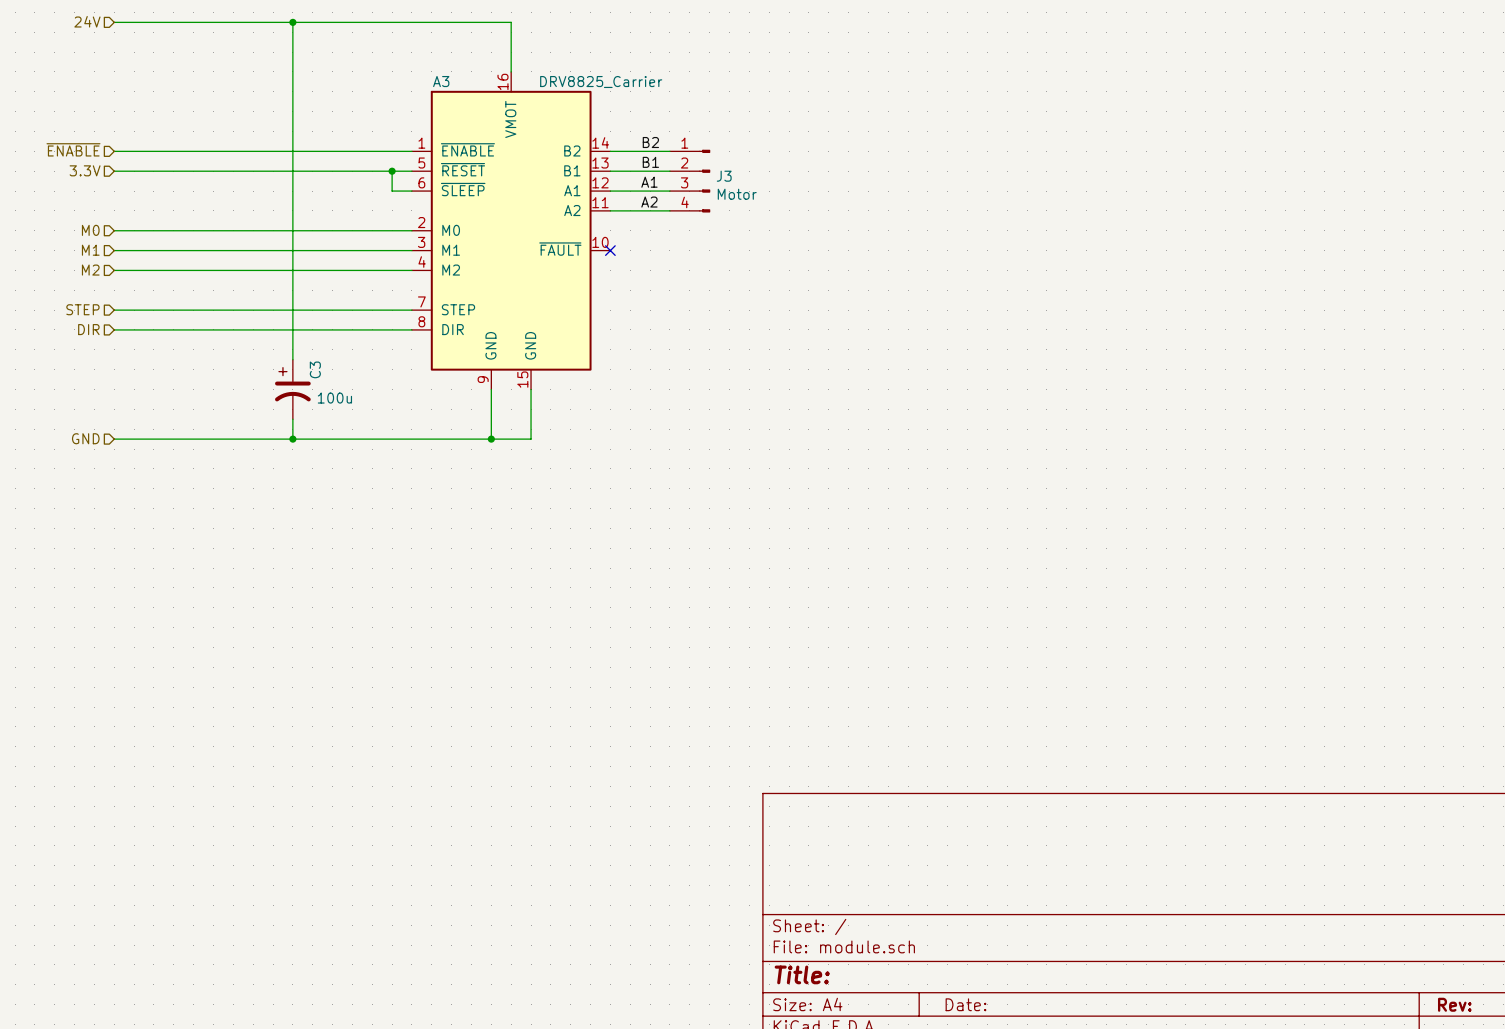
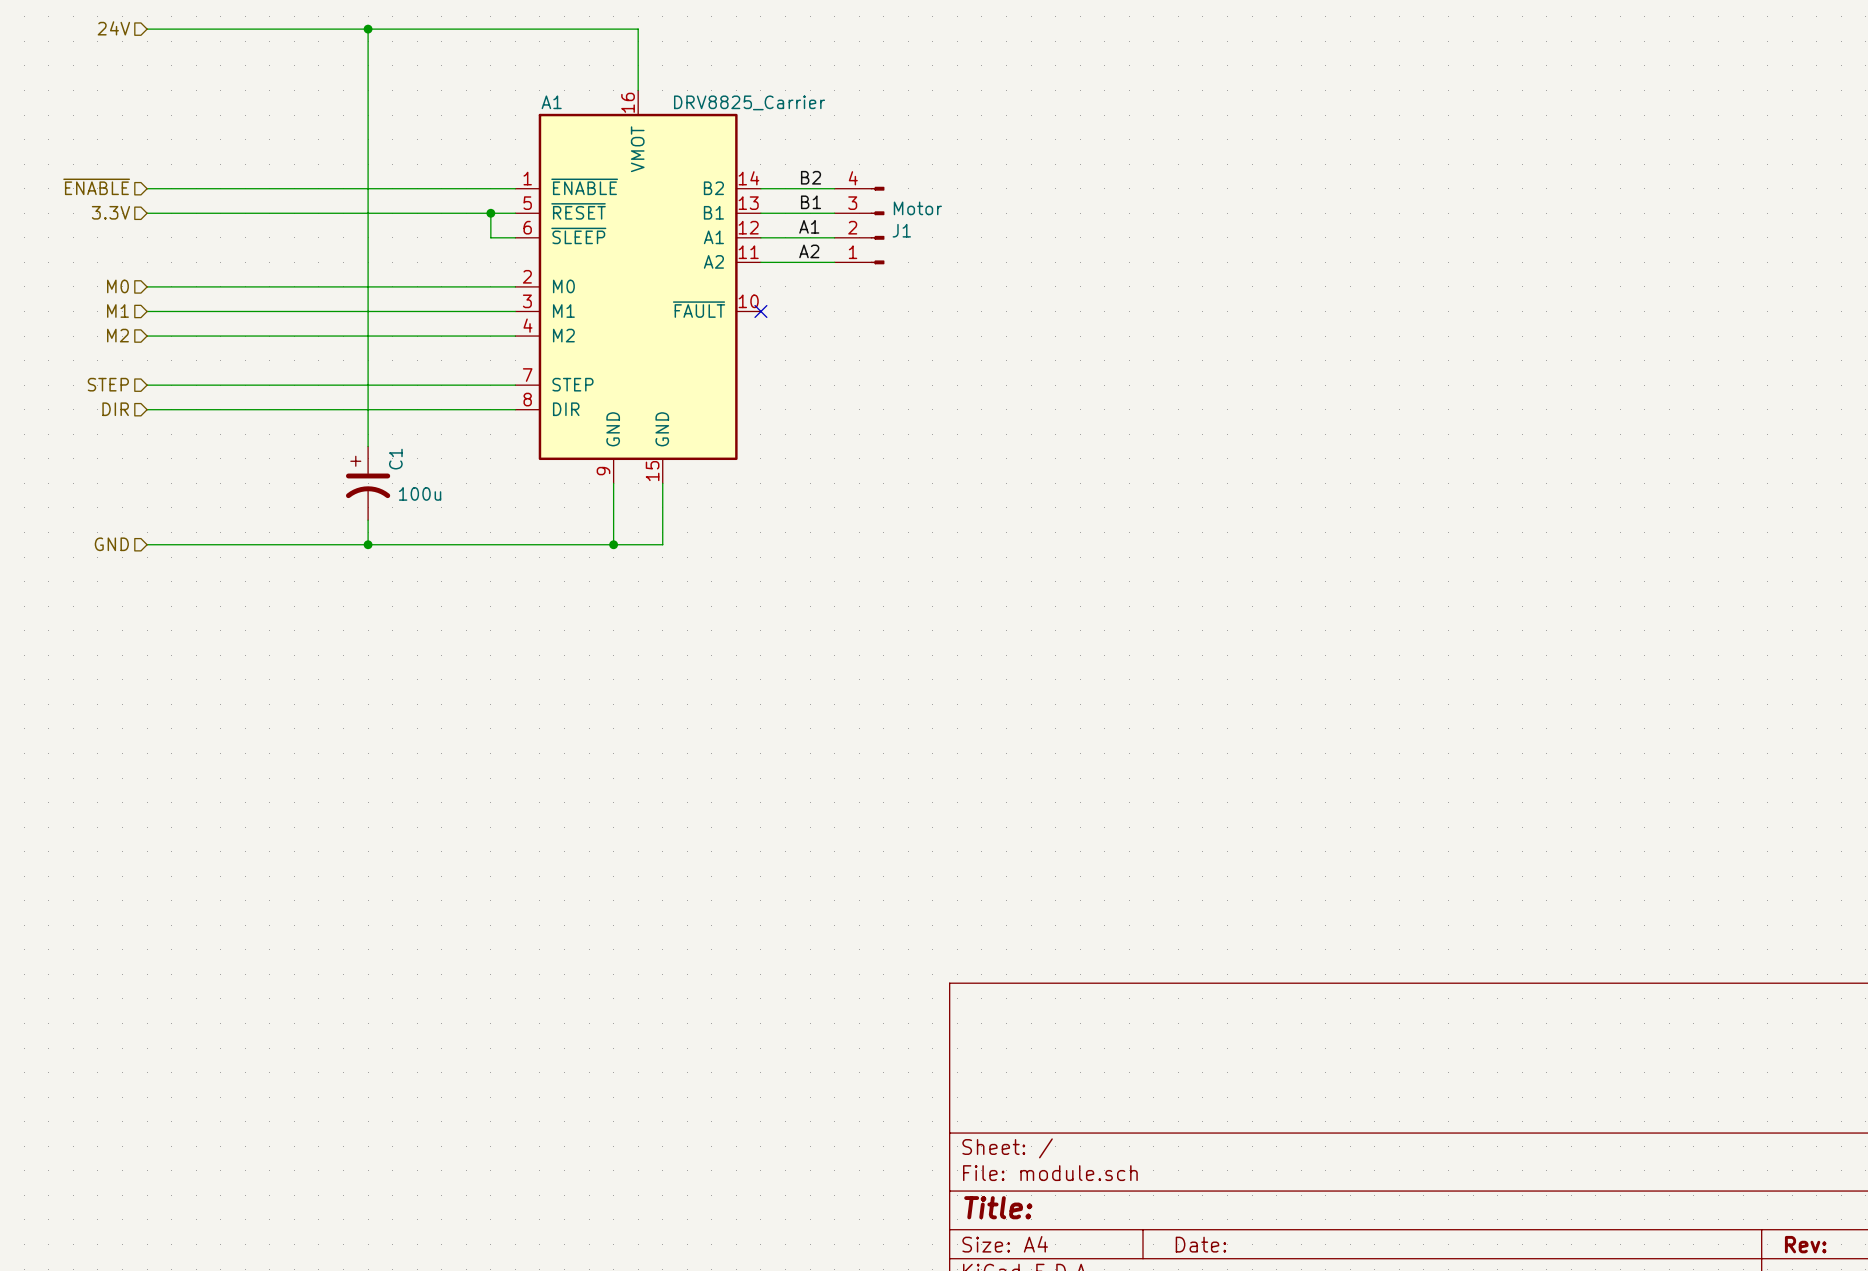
A3 name: A3 (441, 81) -> A1 (551, 102)
J3 name: J3 (724, 176) -> J1 (901, 230)
J3 flip: as is (704, 181) -> up-down (877, 225)
C3 name: C3 (315, 369) -> C1 (395, 459)

